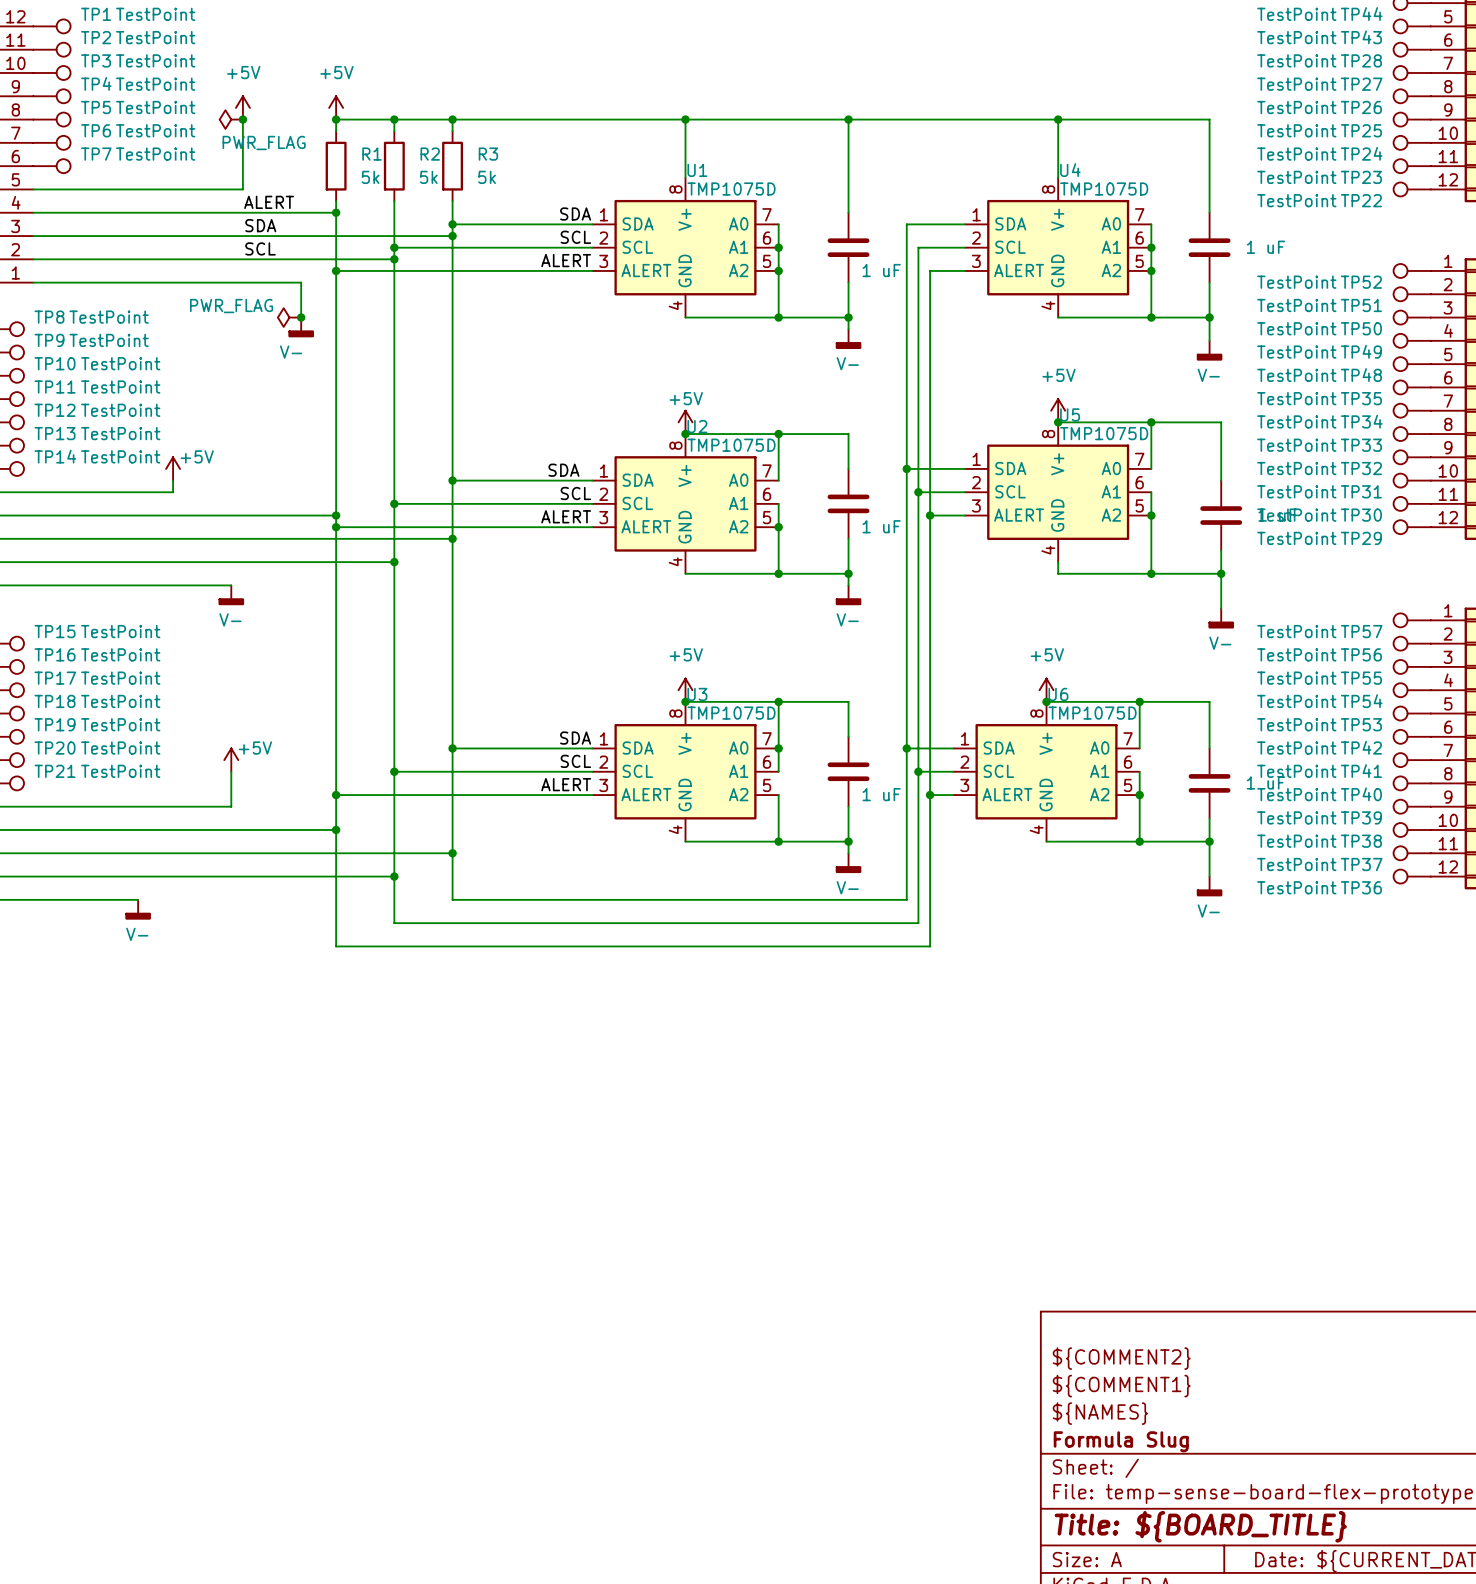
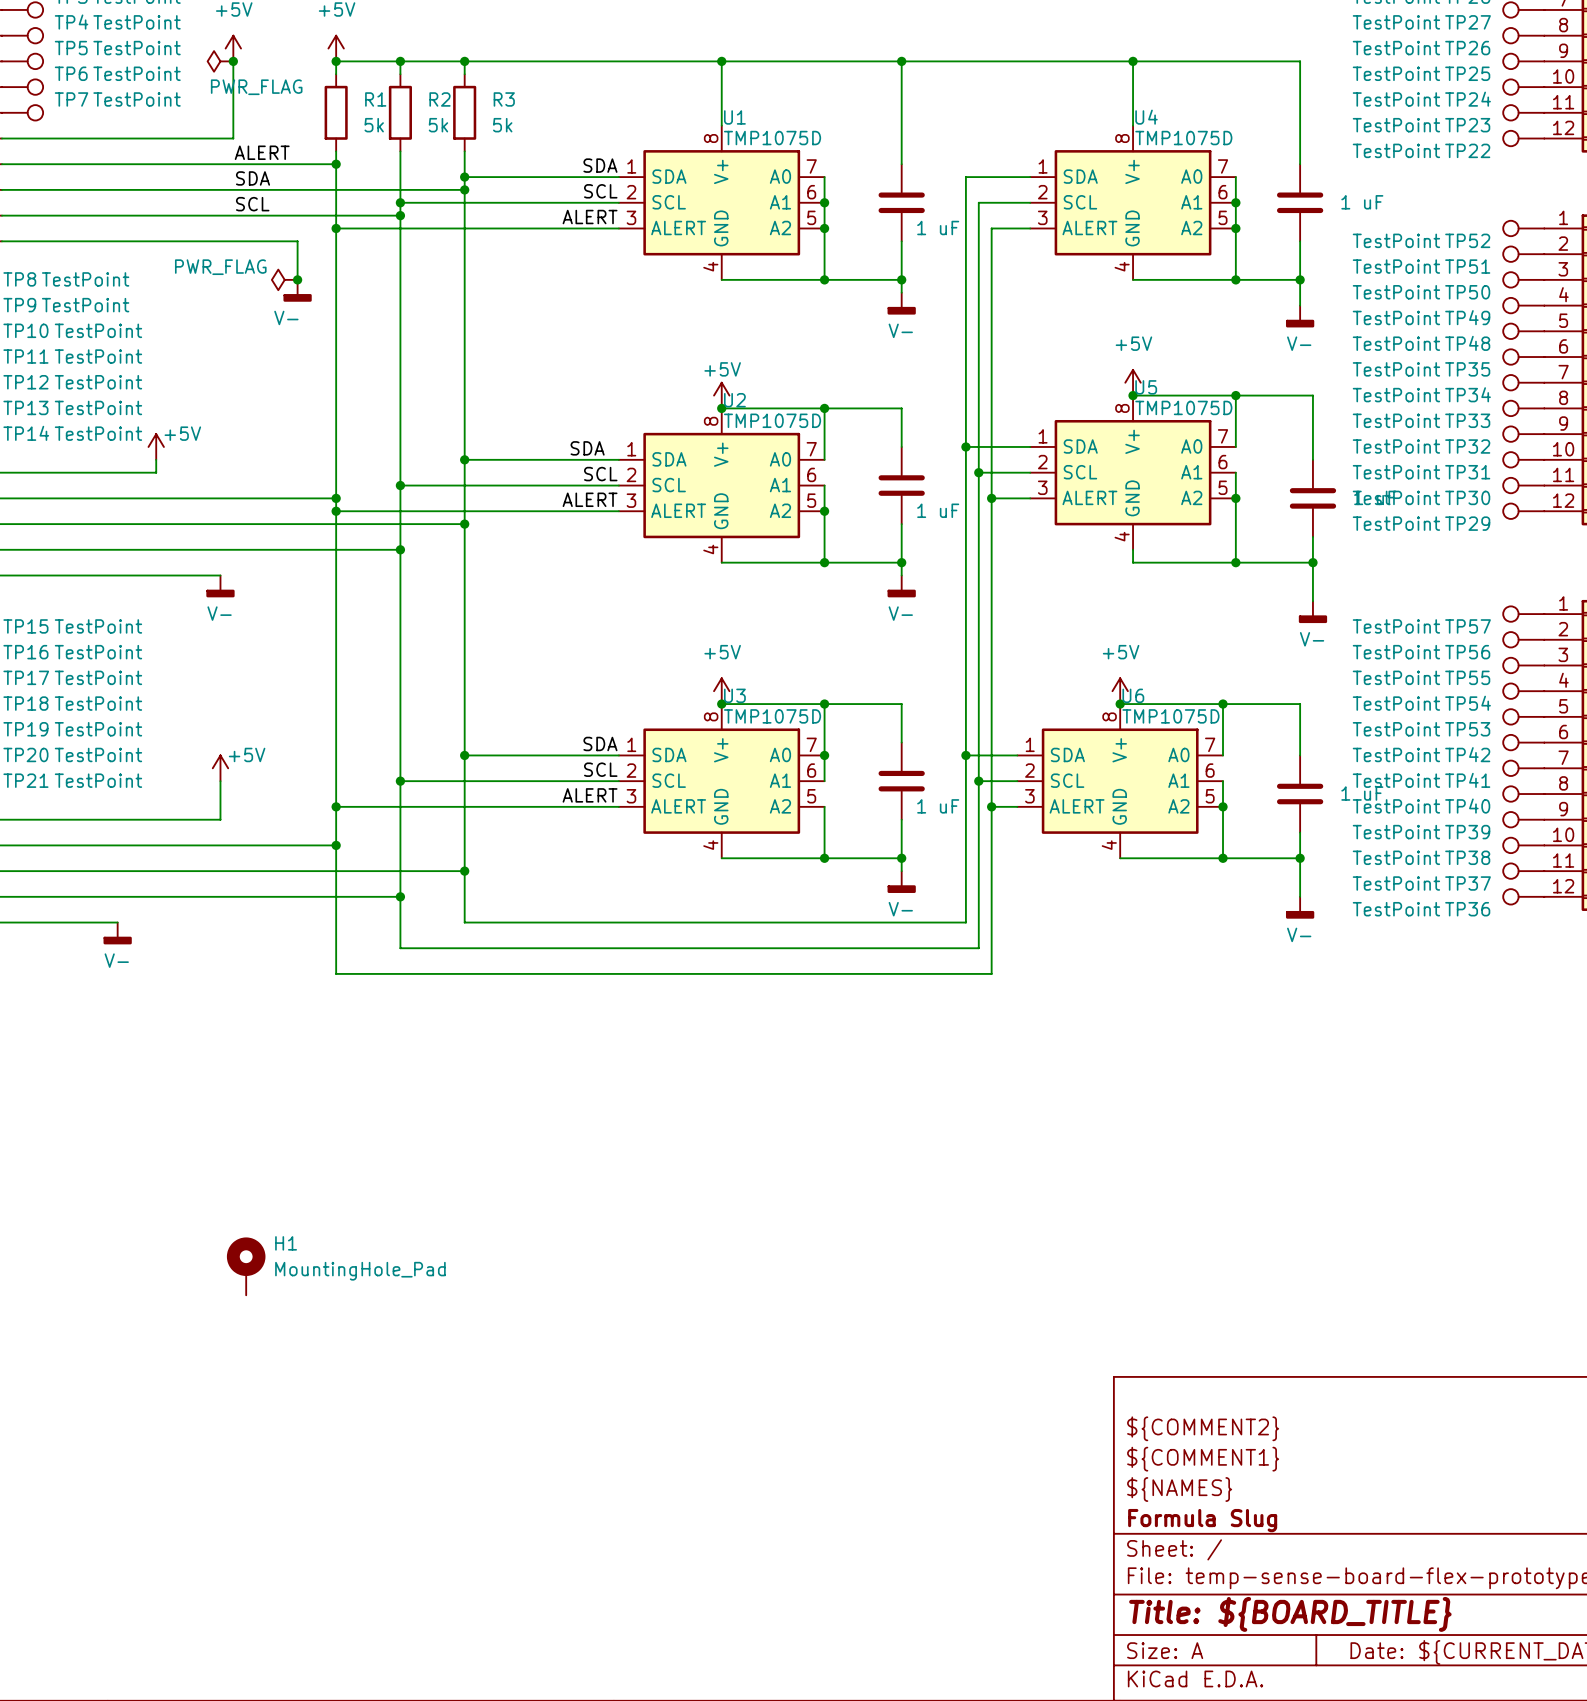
H1: none -> MountingHole_Pad (246, 1266)

